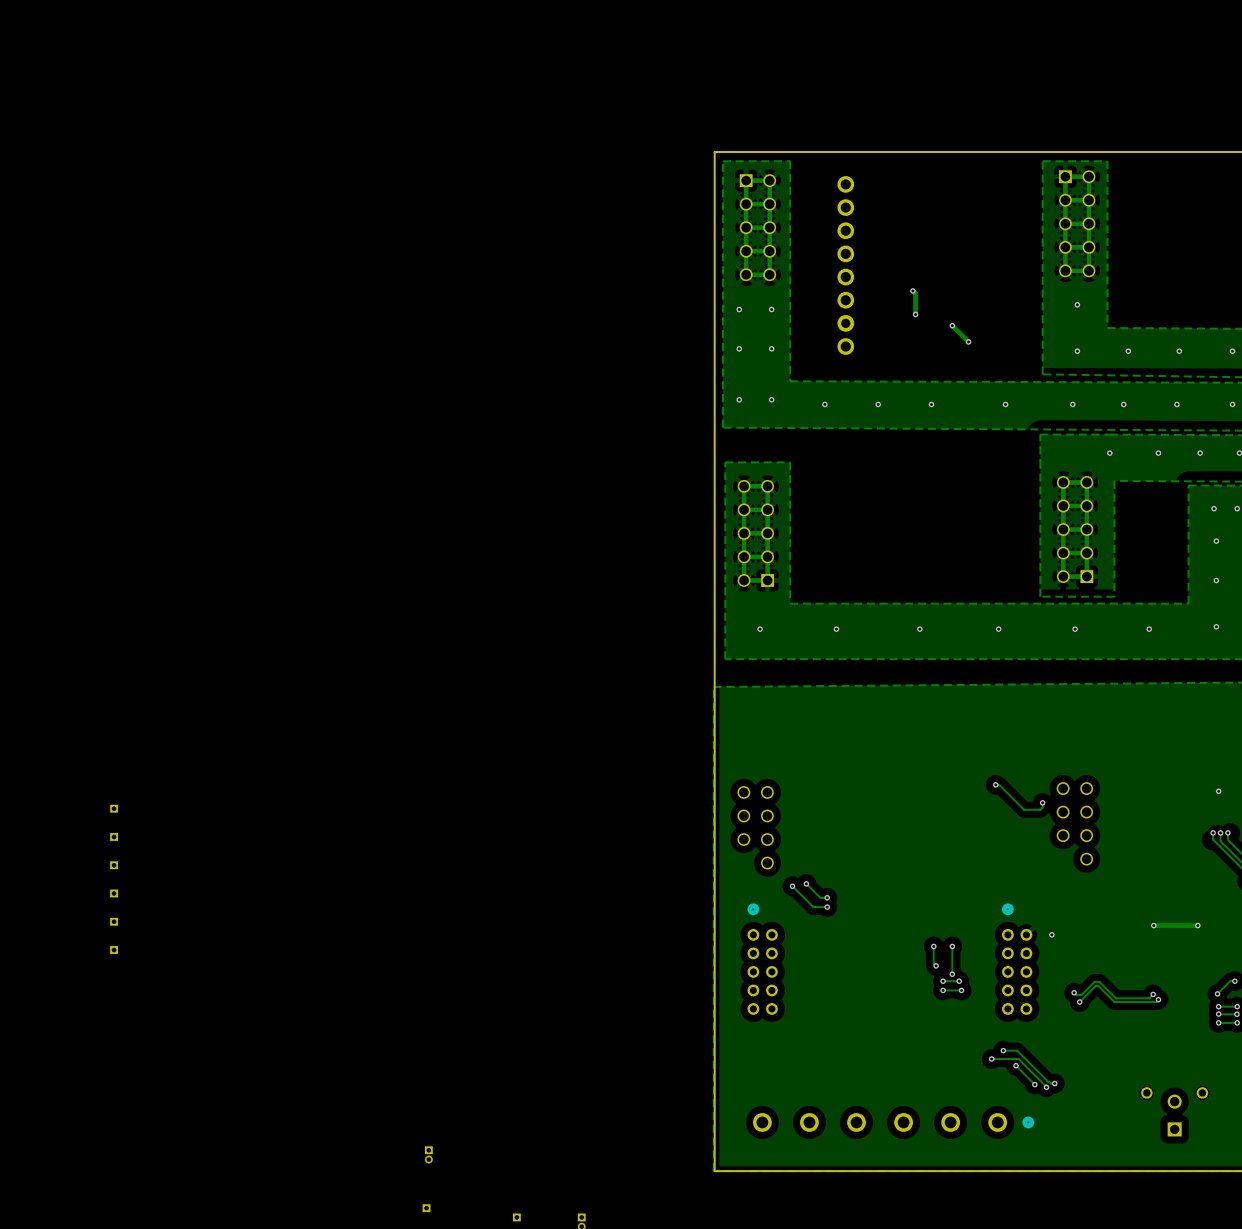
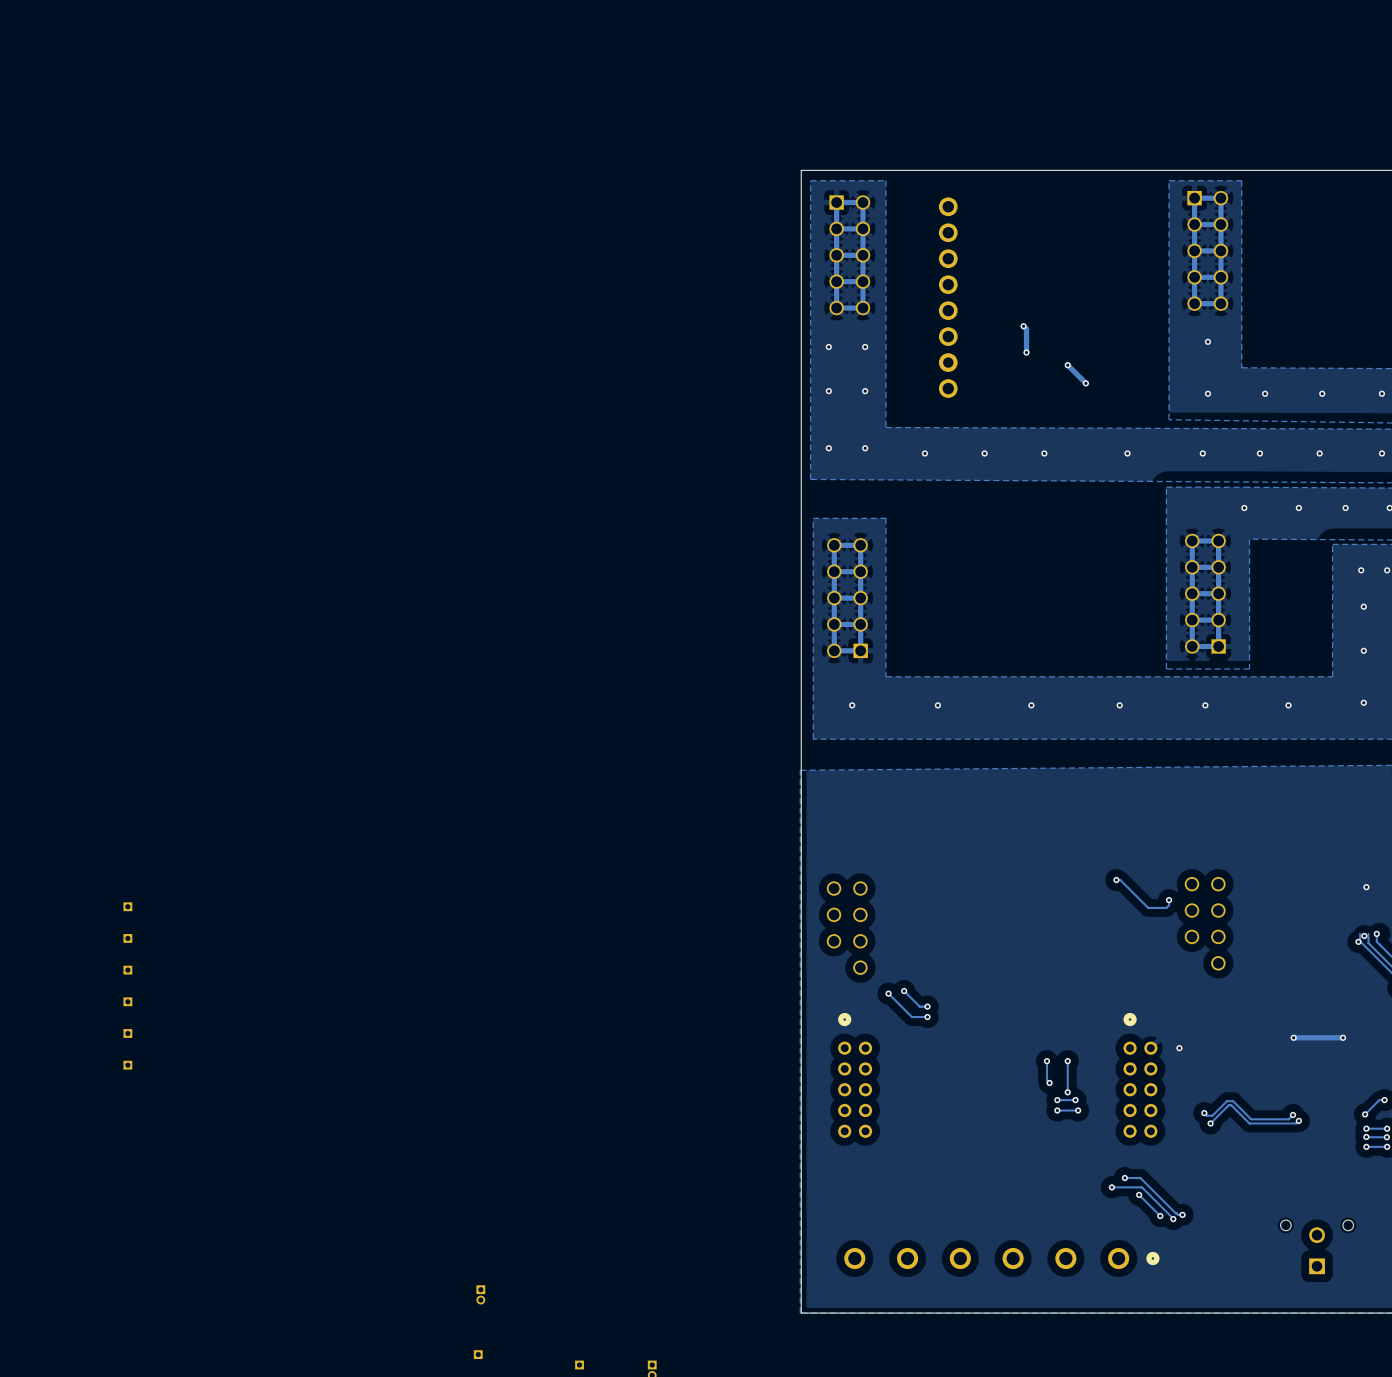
via: (1213, 832) -> none
via: (1220, 832) -> none
via: none -> (1364, 935)
via: none -> (1358, 941)

